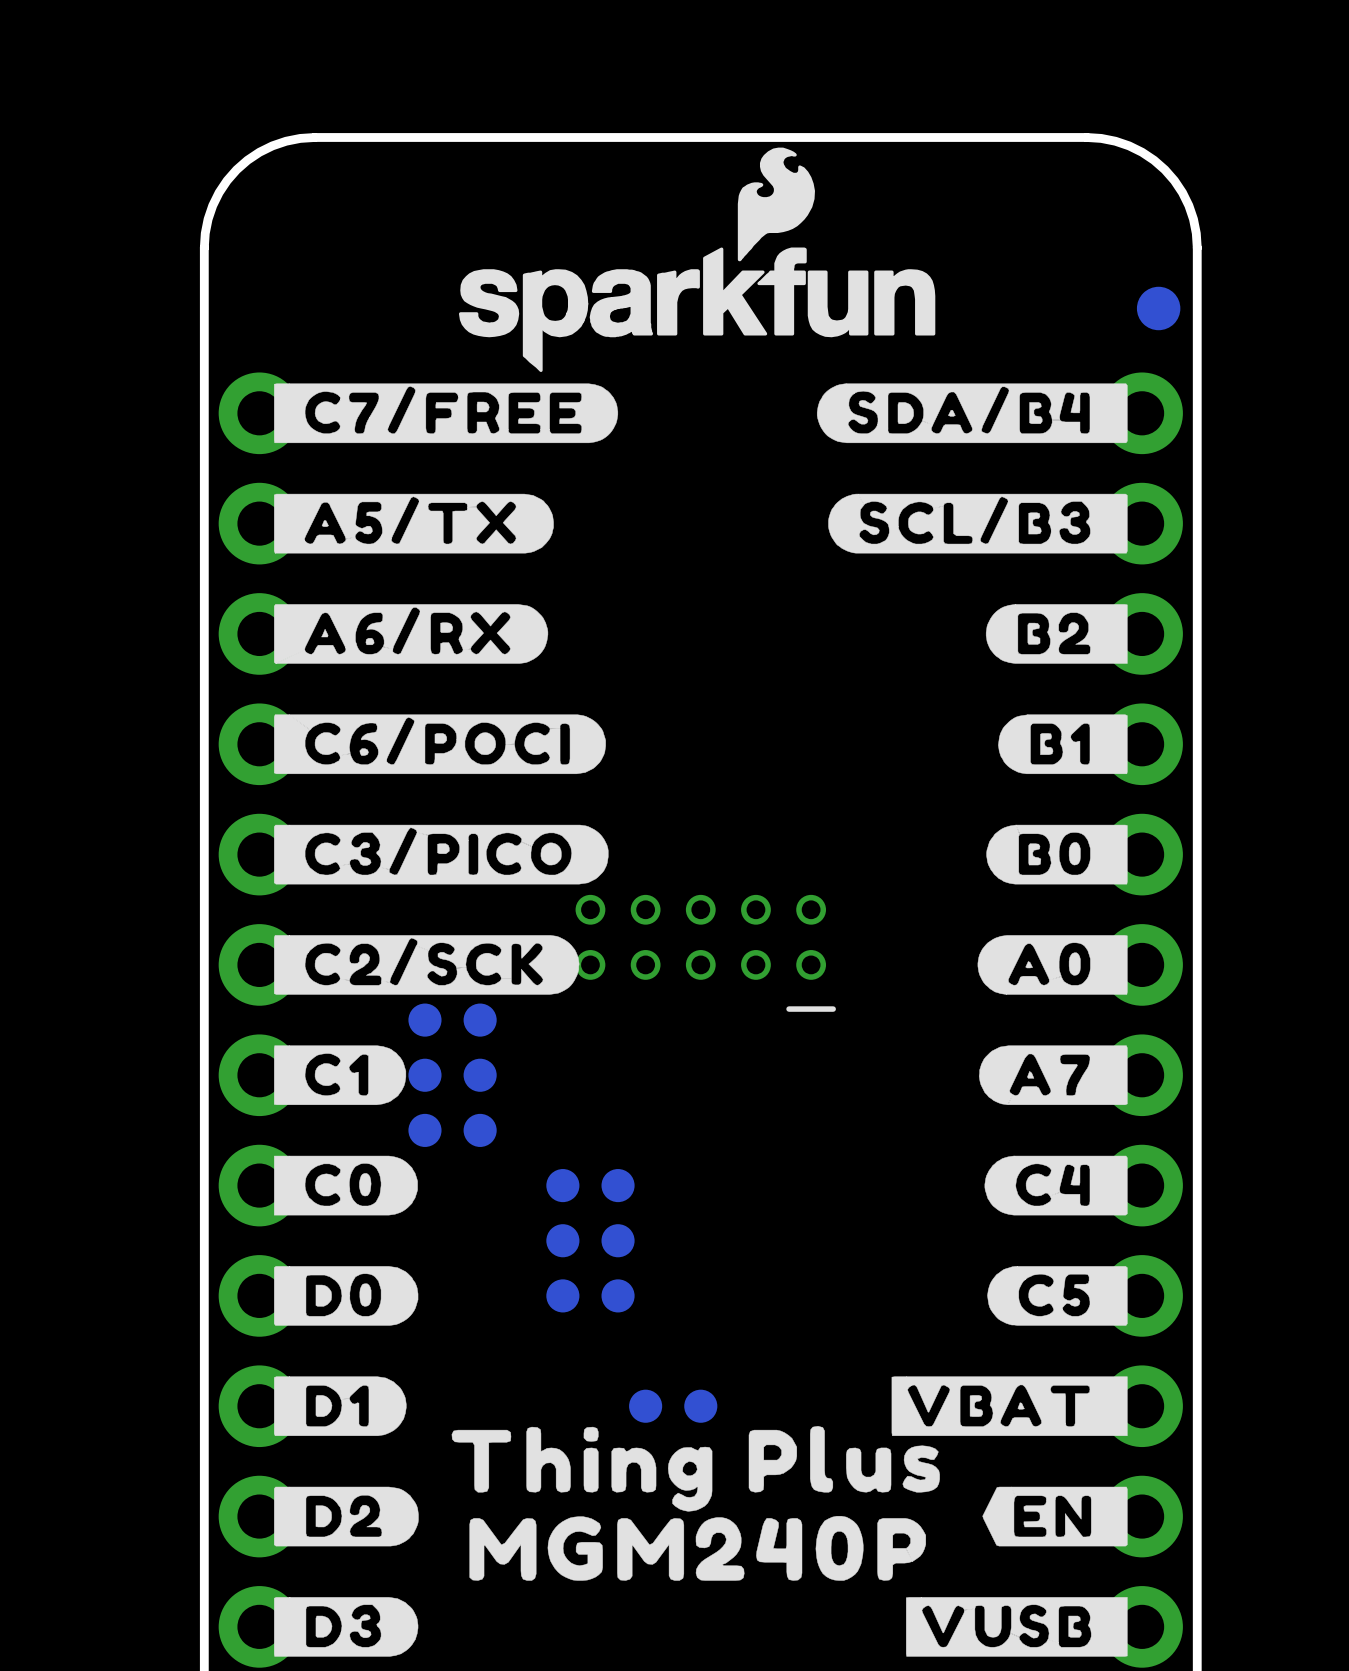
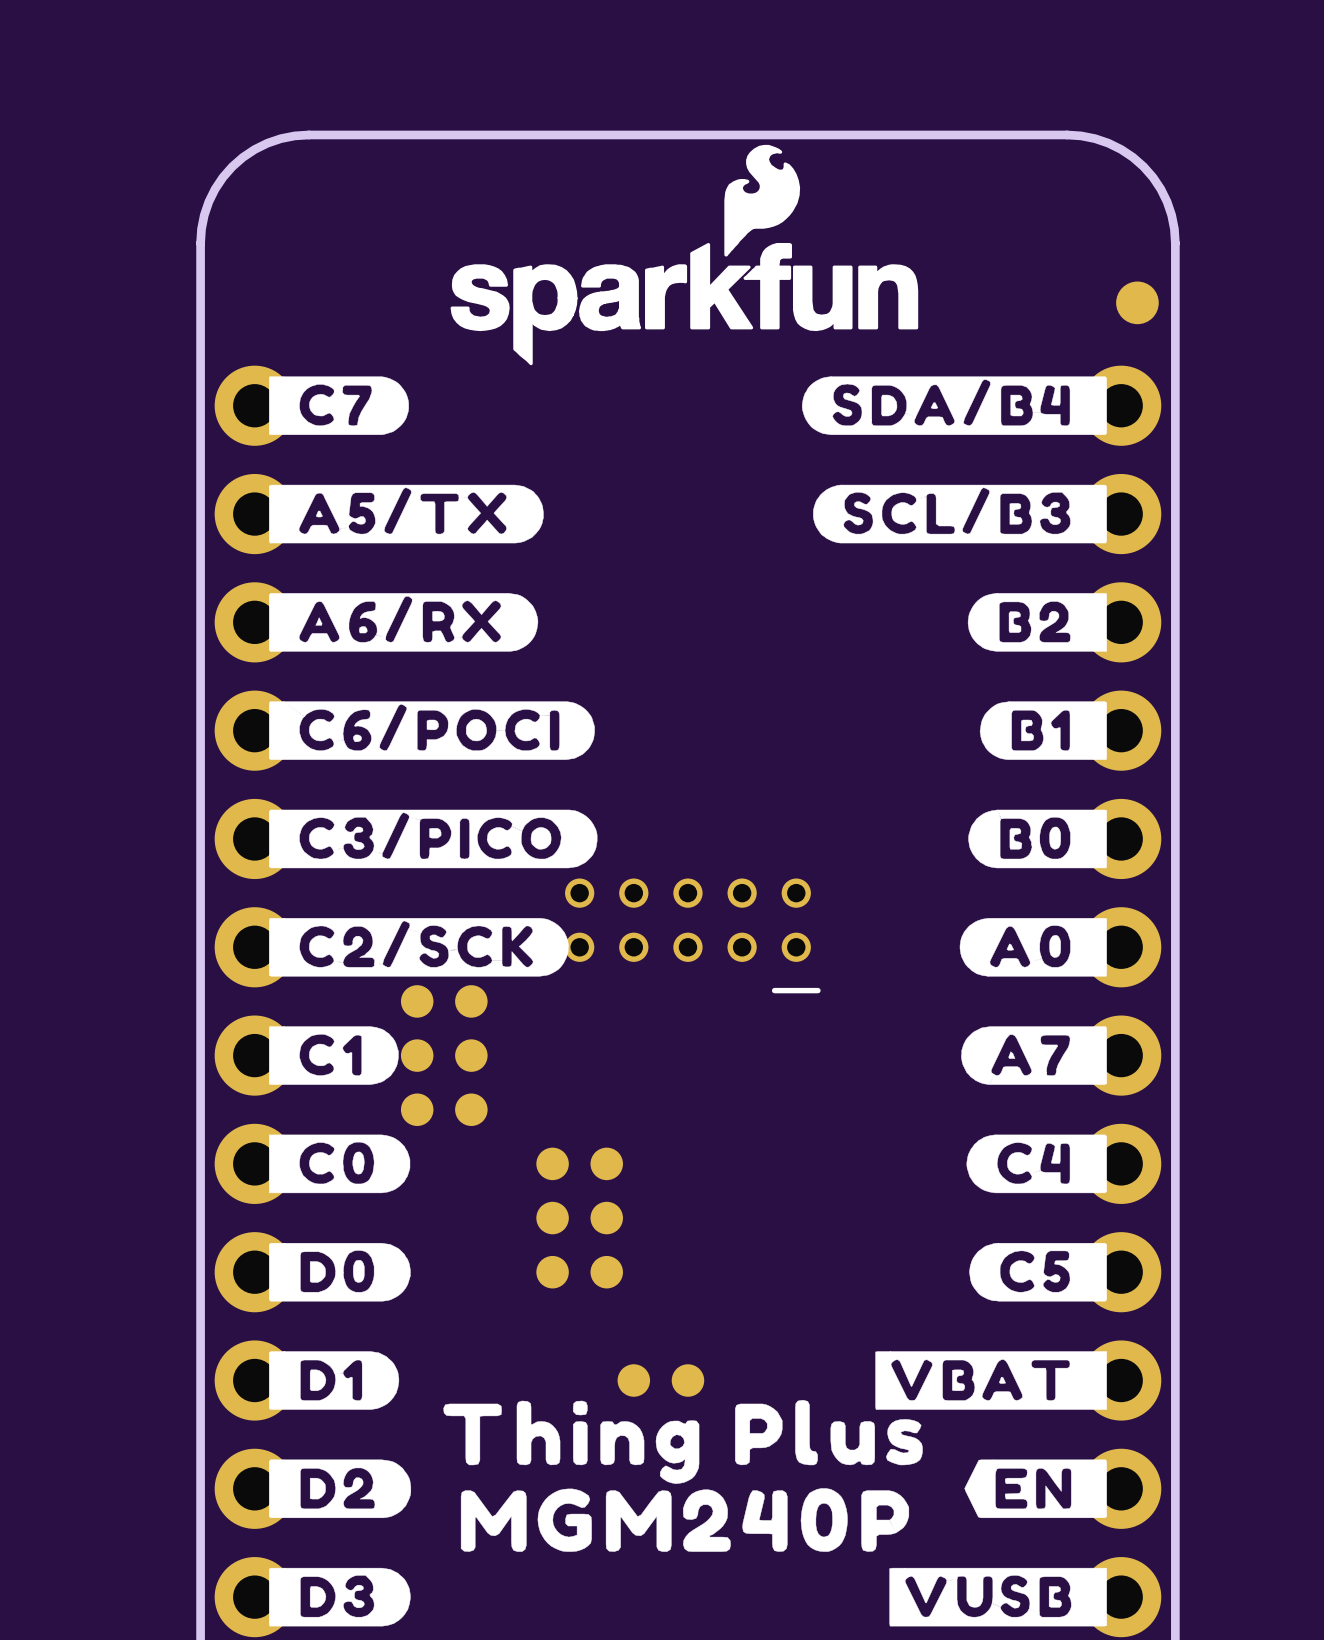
drawing: [274, 383, 619, 444] -> none
drawing: none -> [269, 376, 409, 435]

